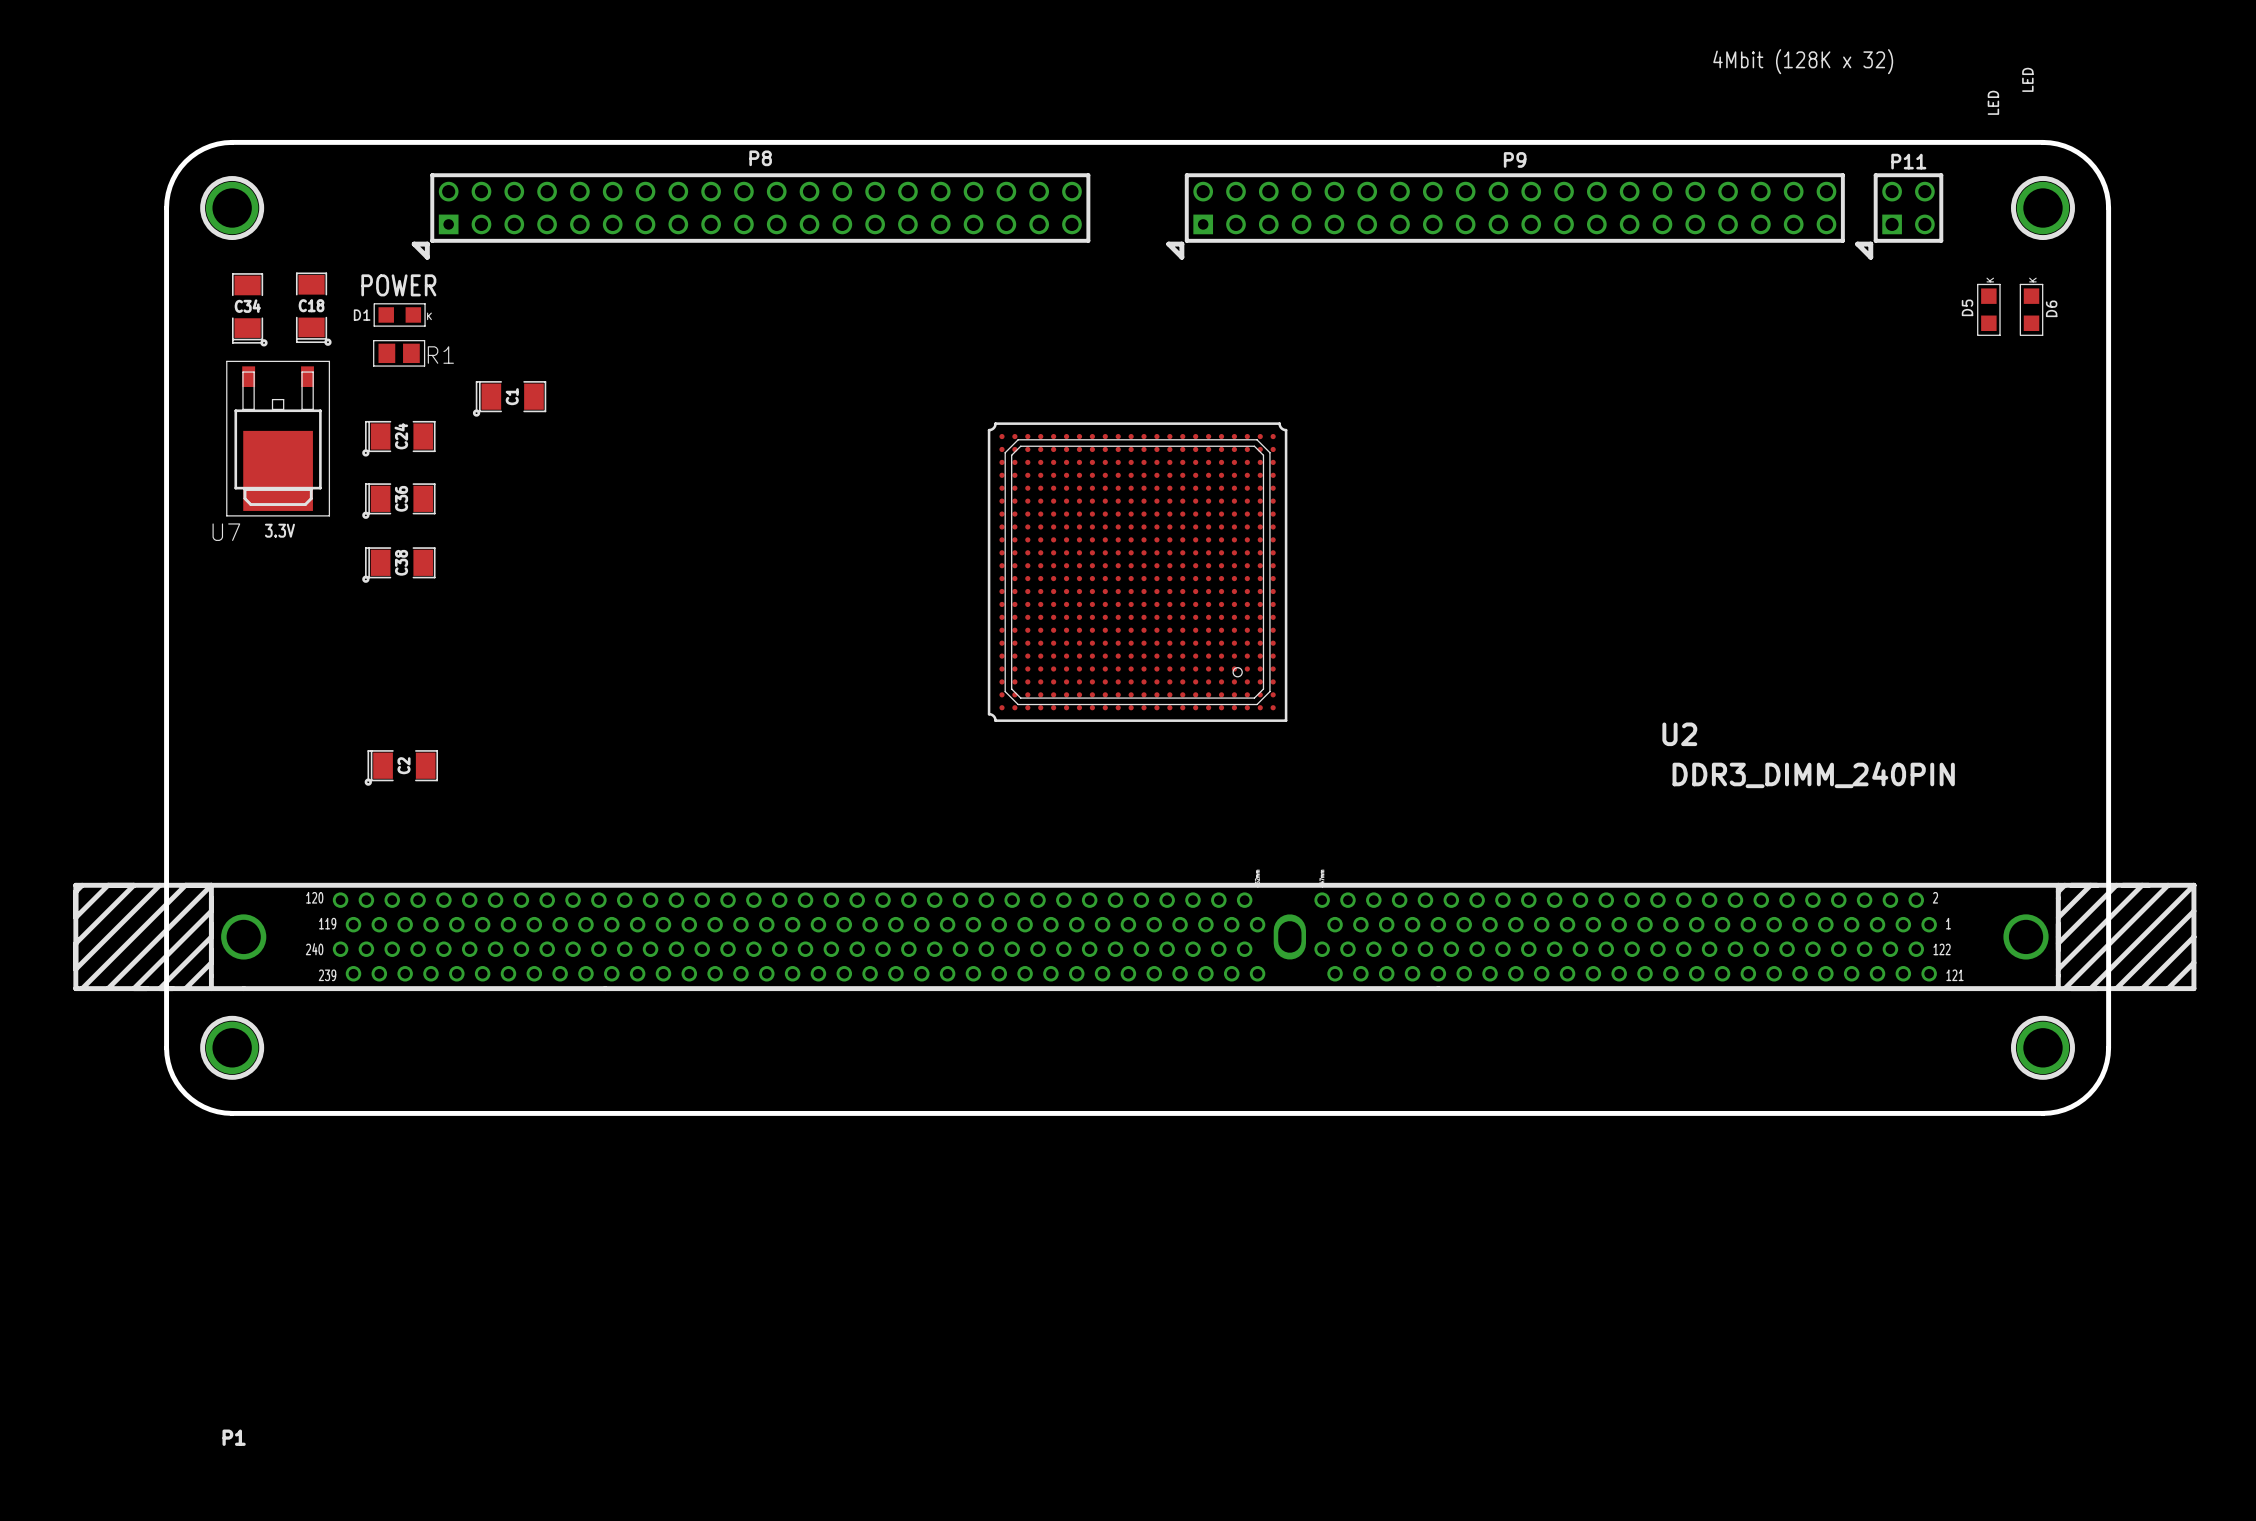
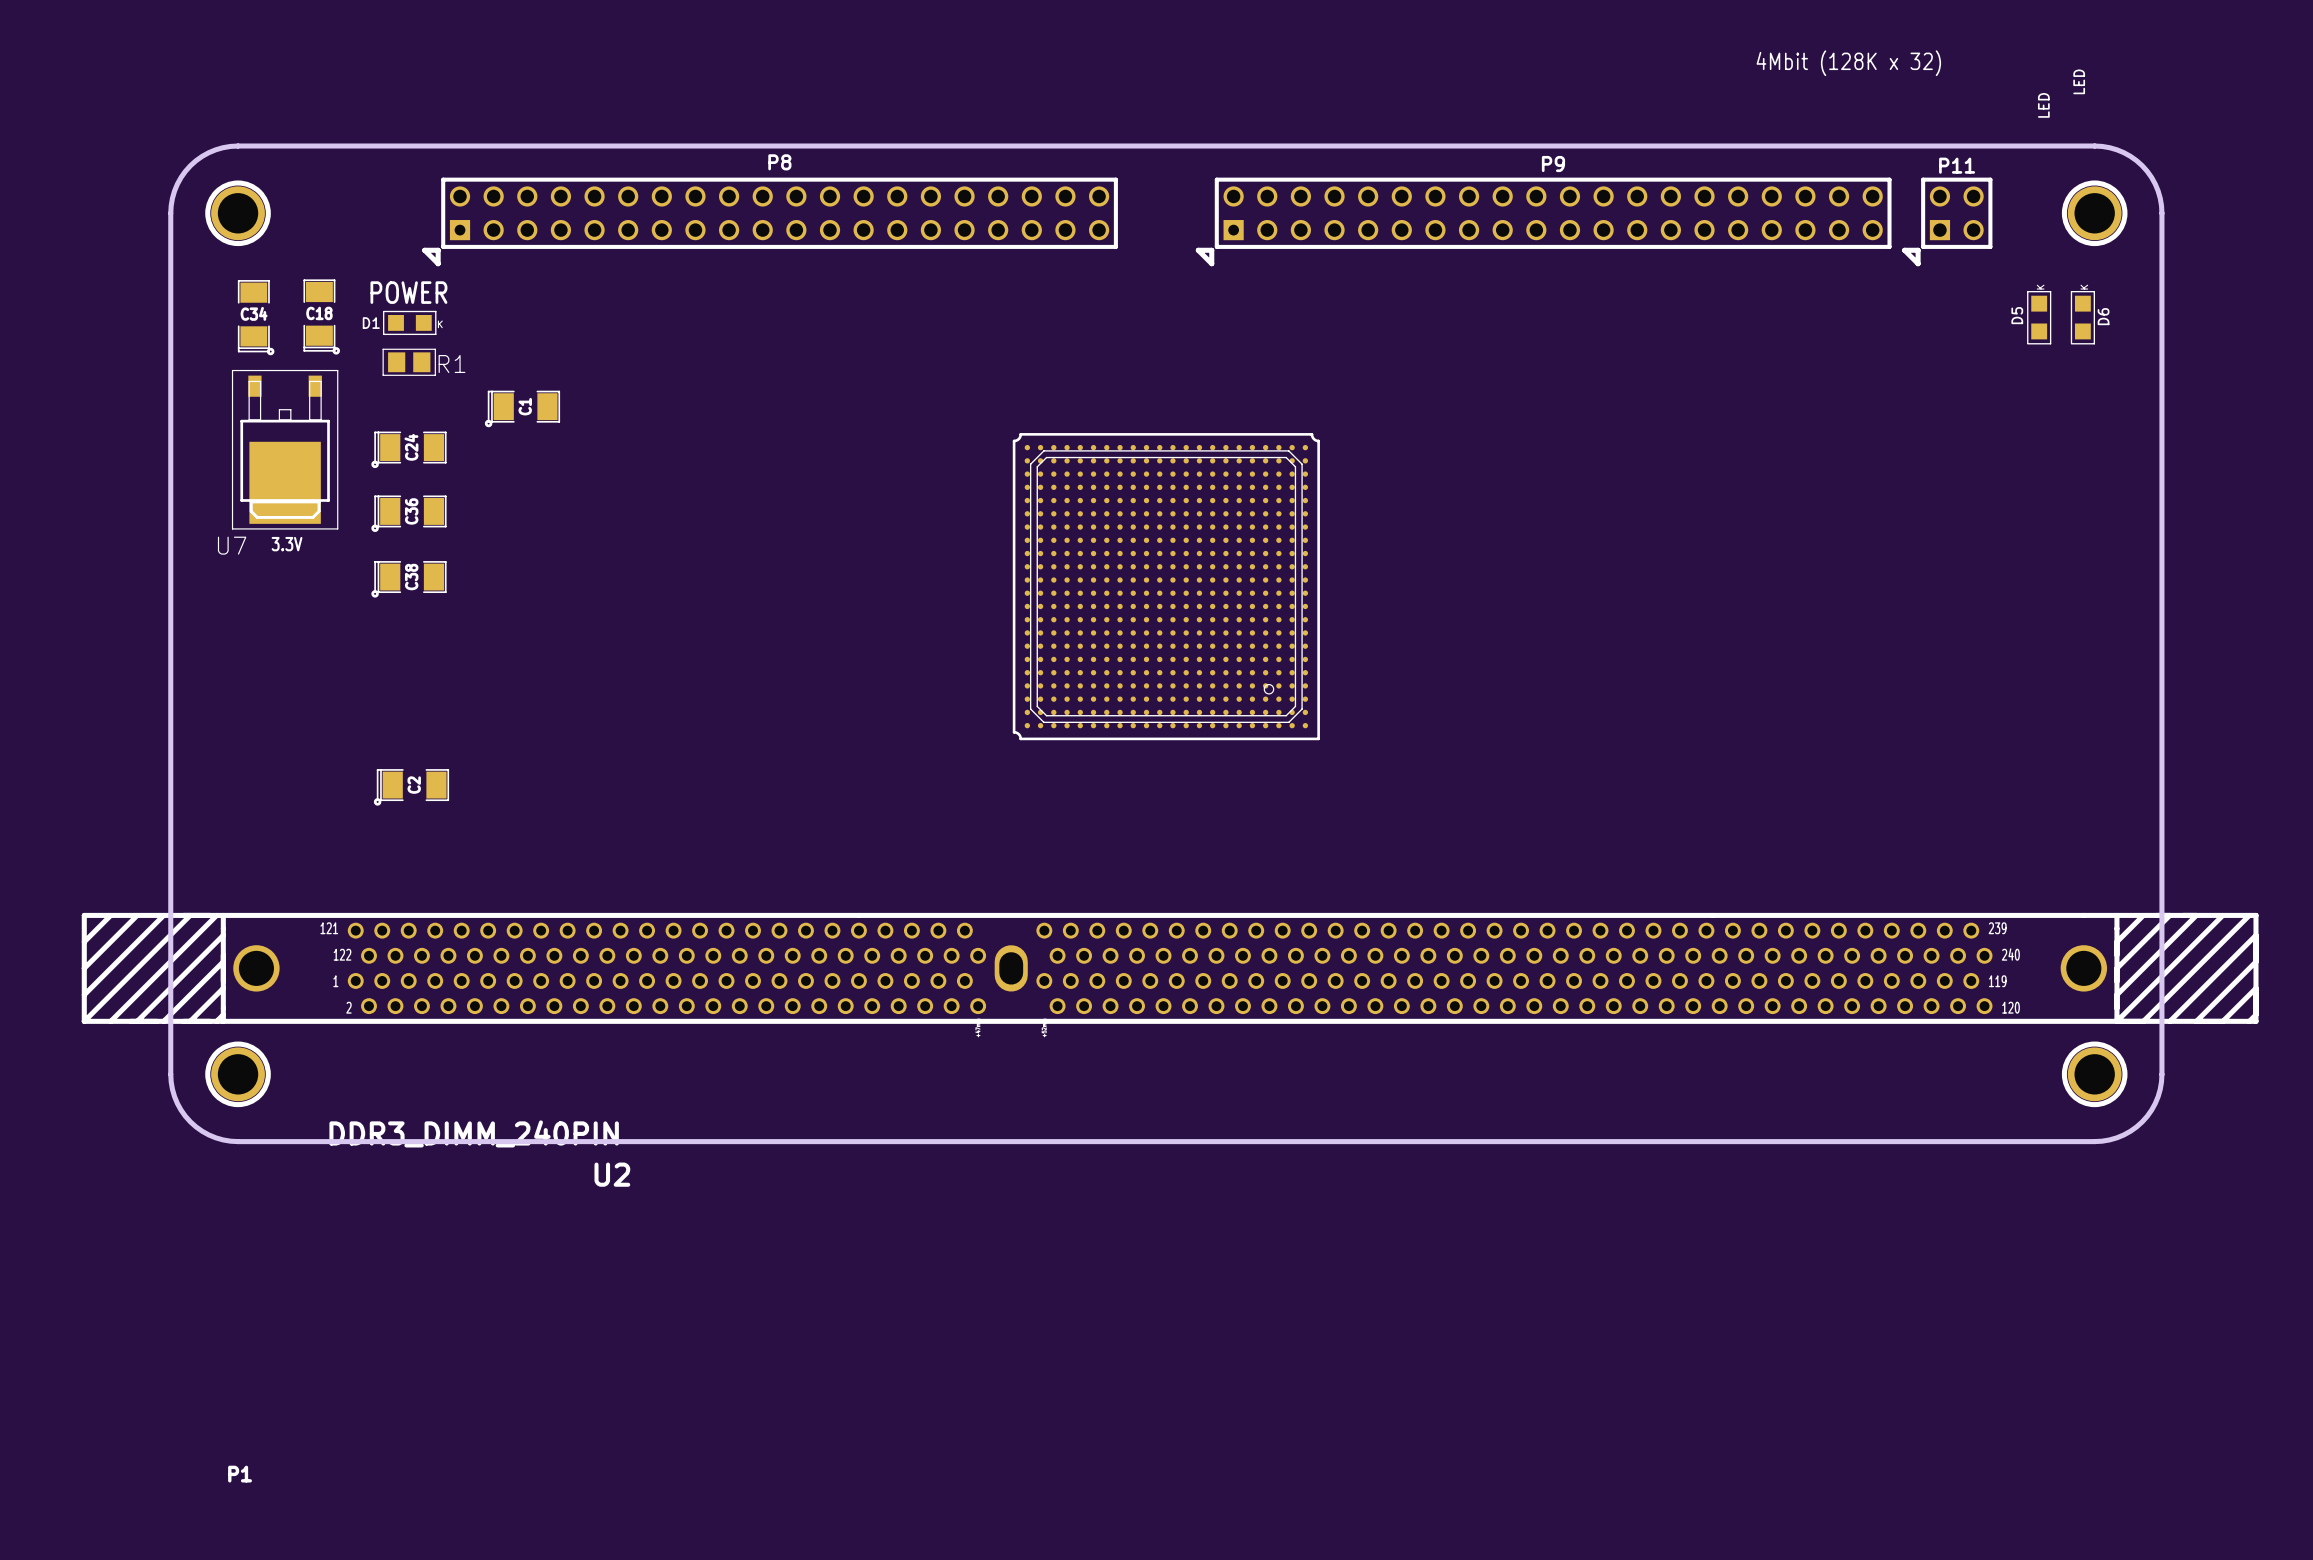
U2 rotation: 0° (1134, 936) -> 180° (1170, 968)

